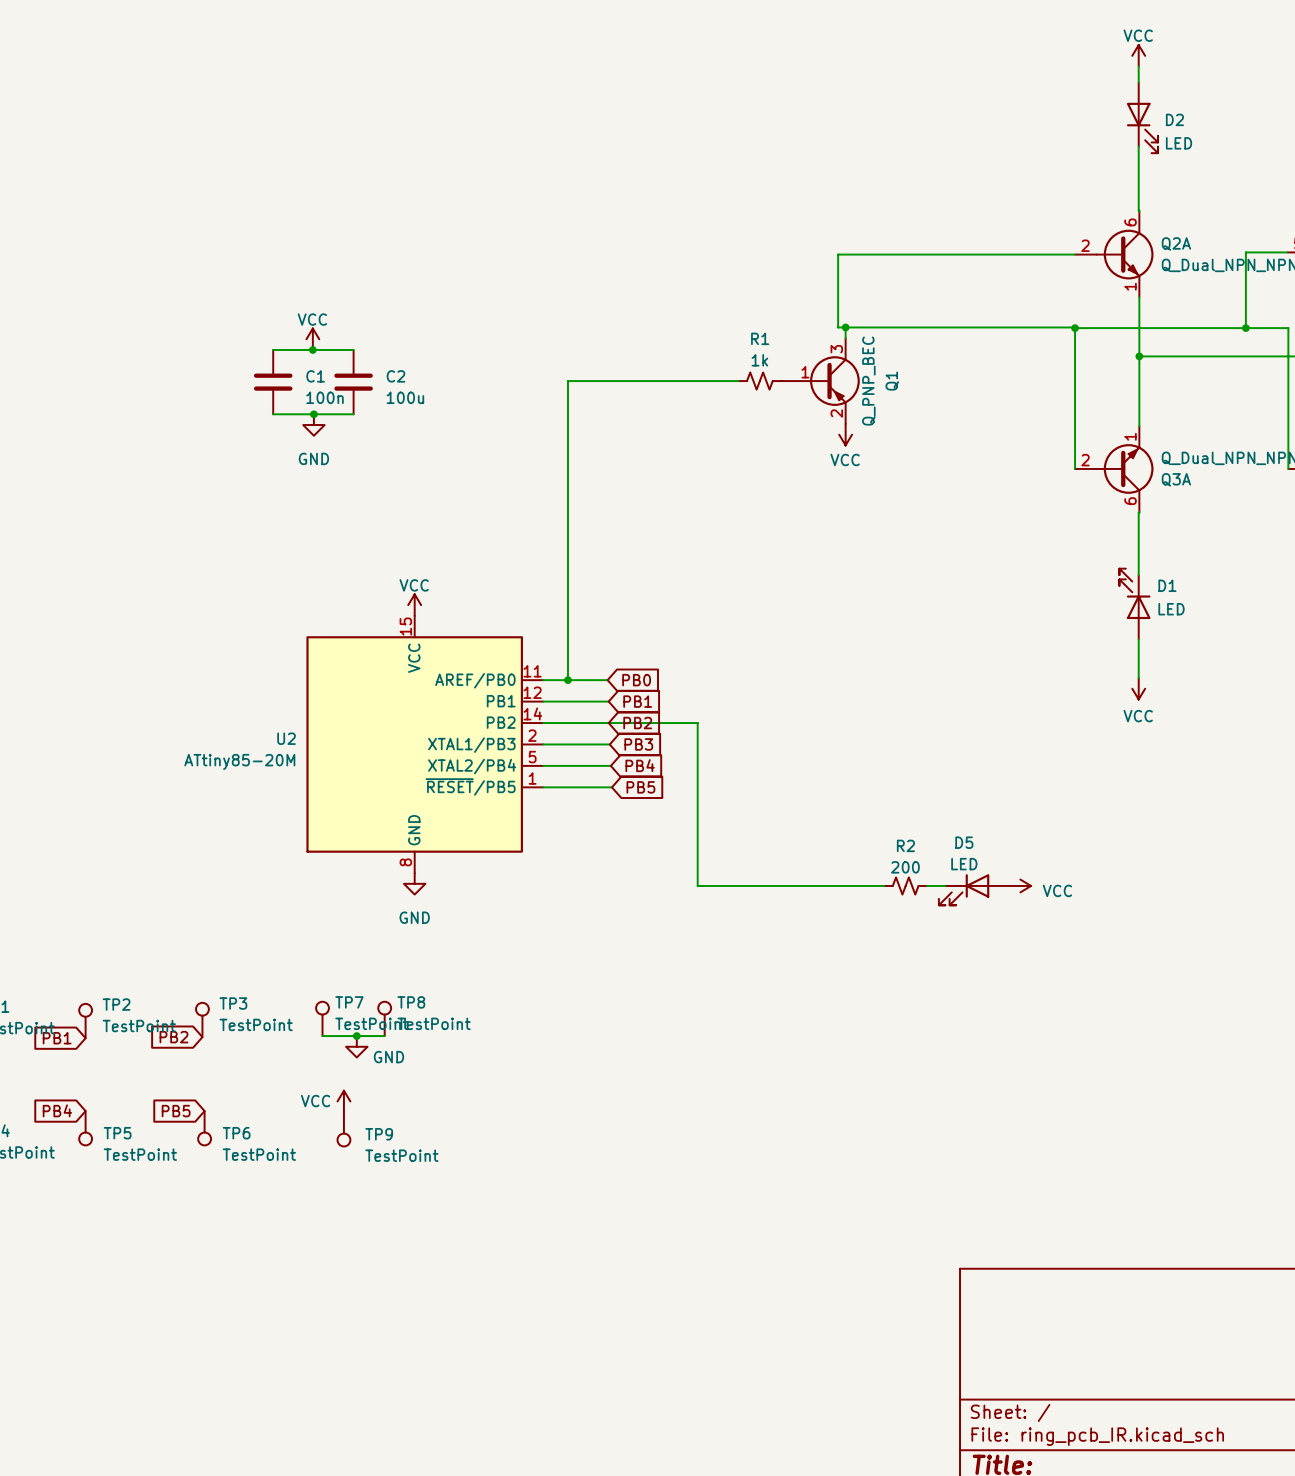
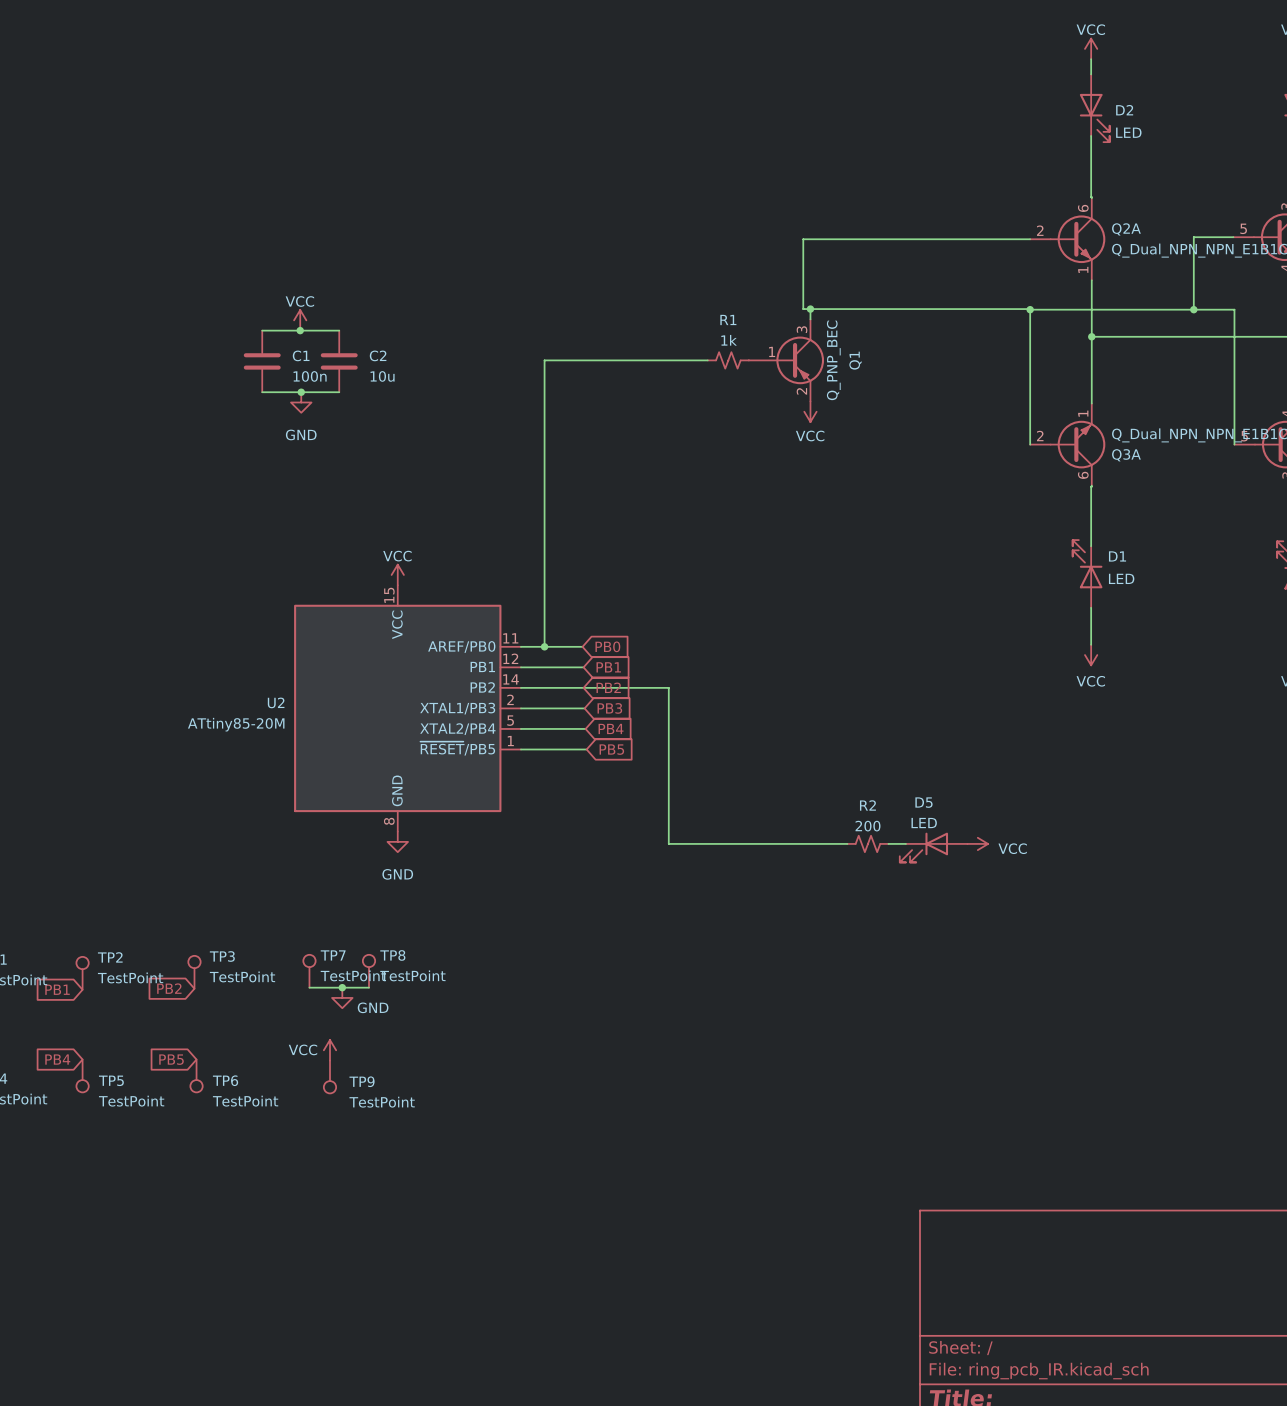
C2 value: 100u (405, 397) -> 10u (382, 376)

